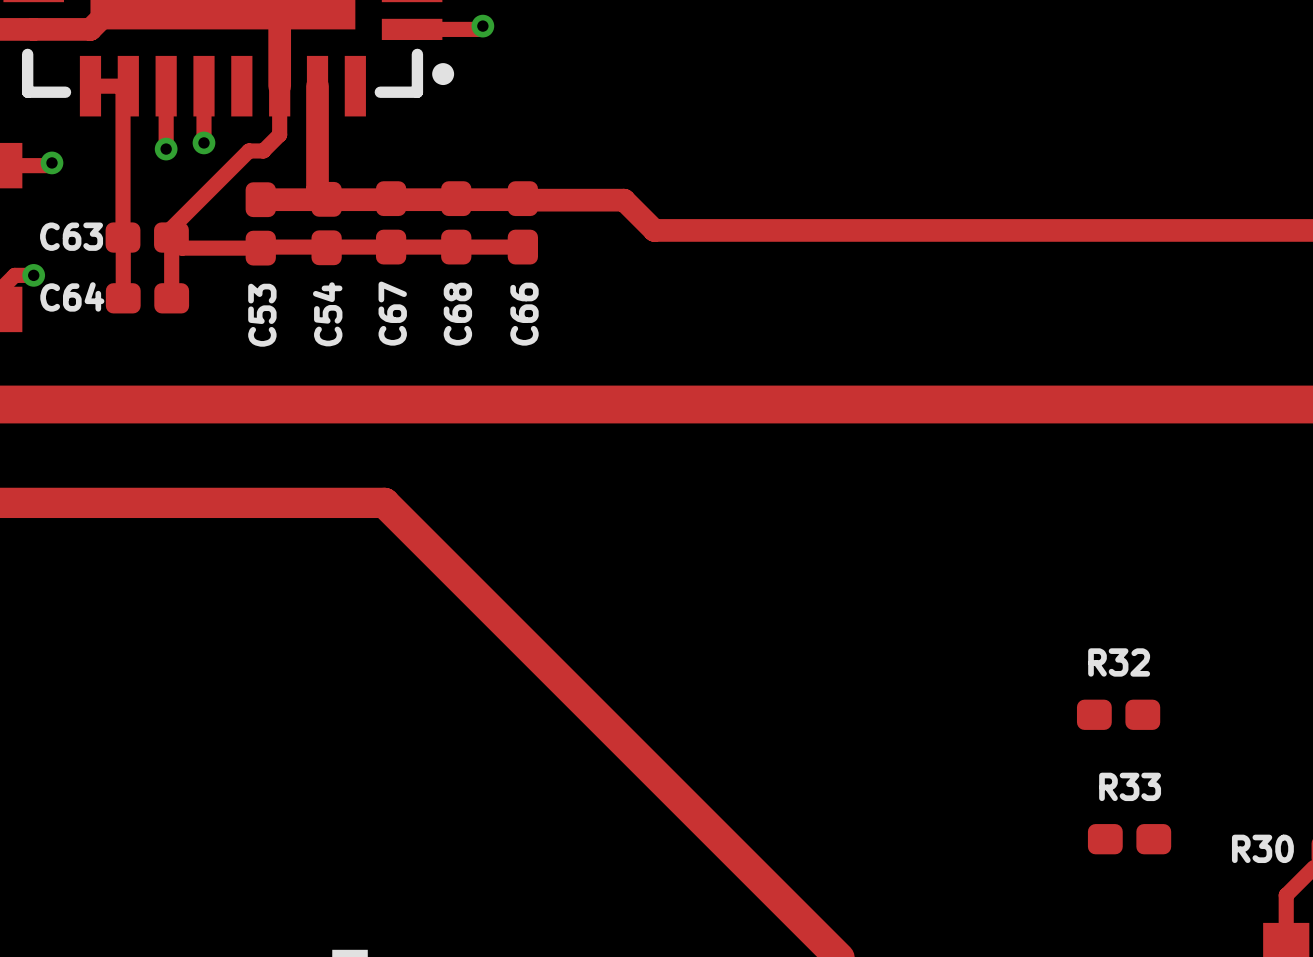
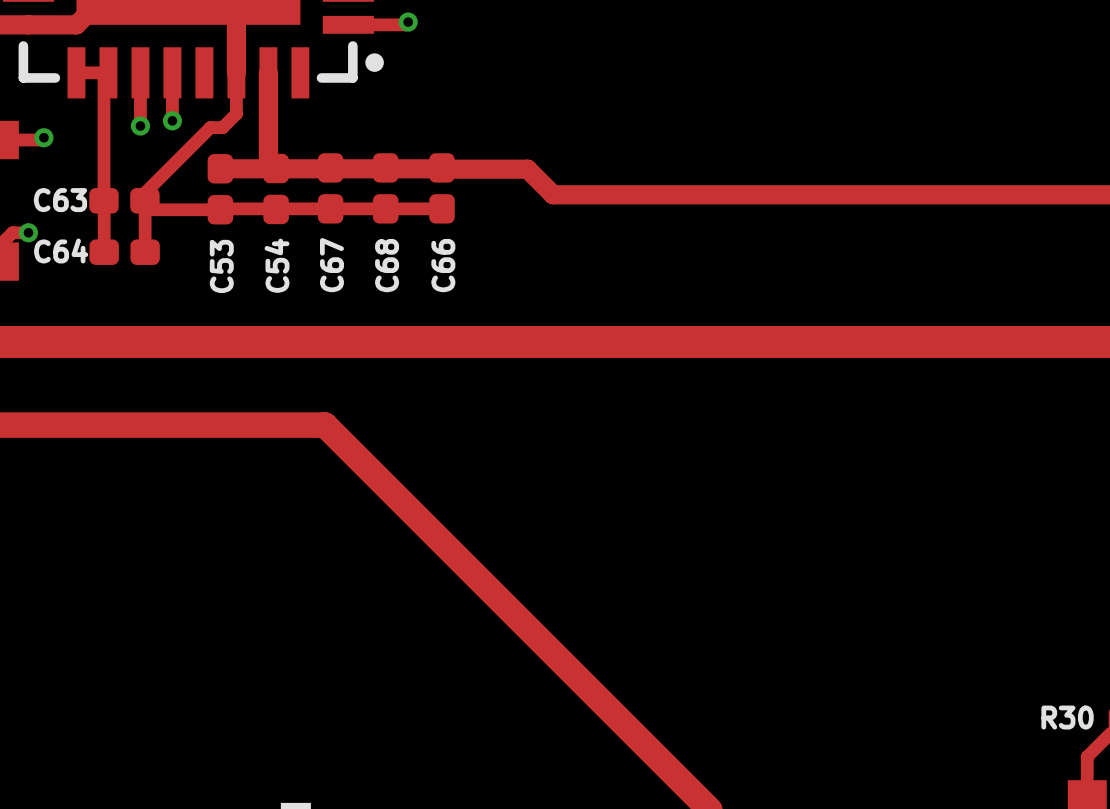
R32: (1118, 714) -> none
R33: (1129, 839) -> none

